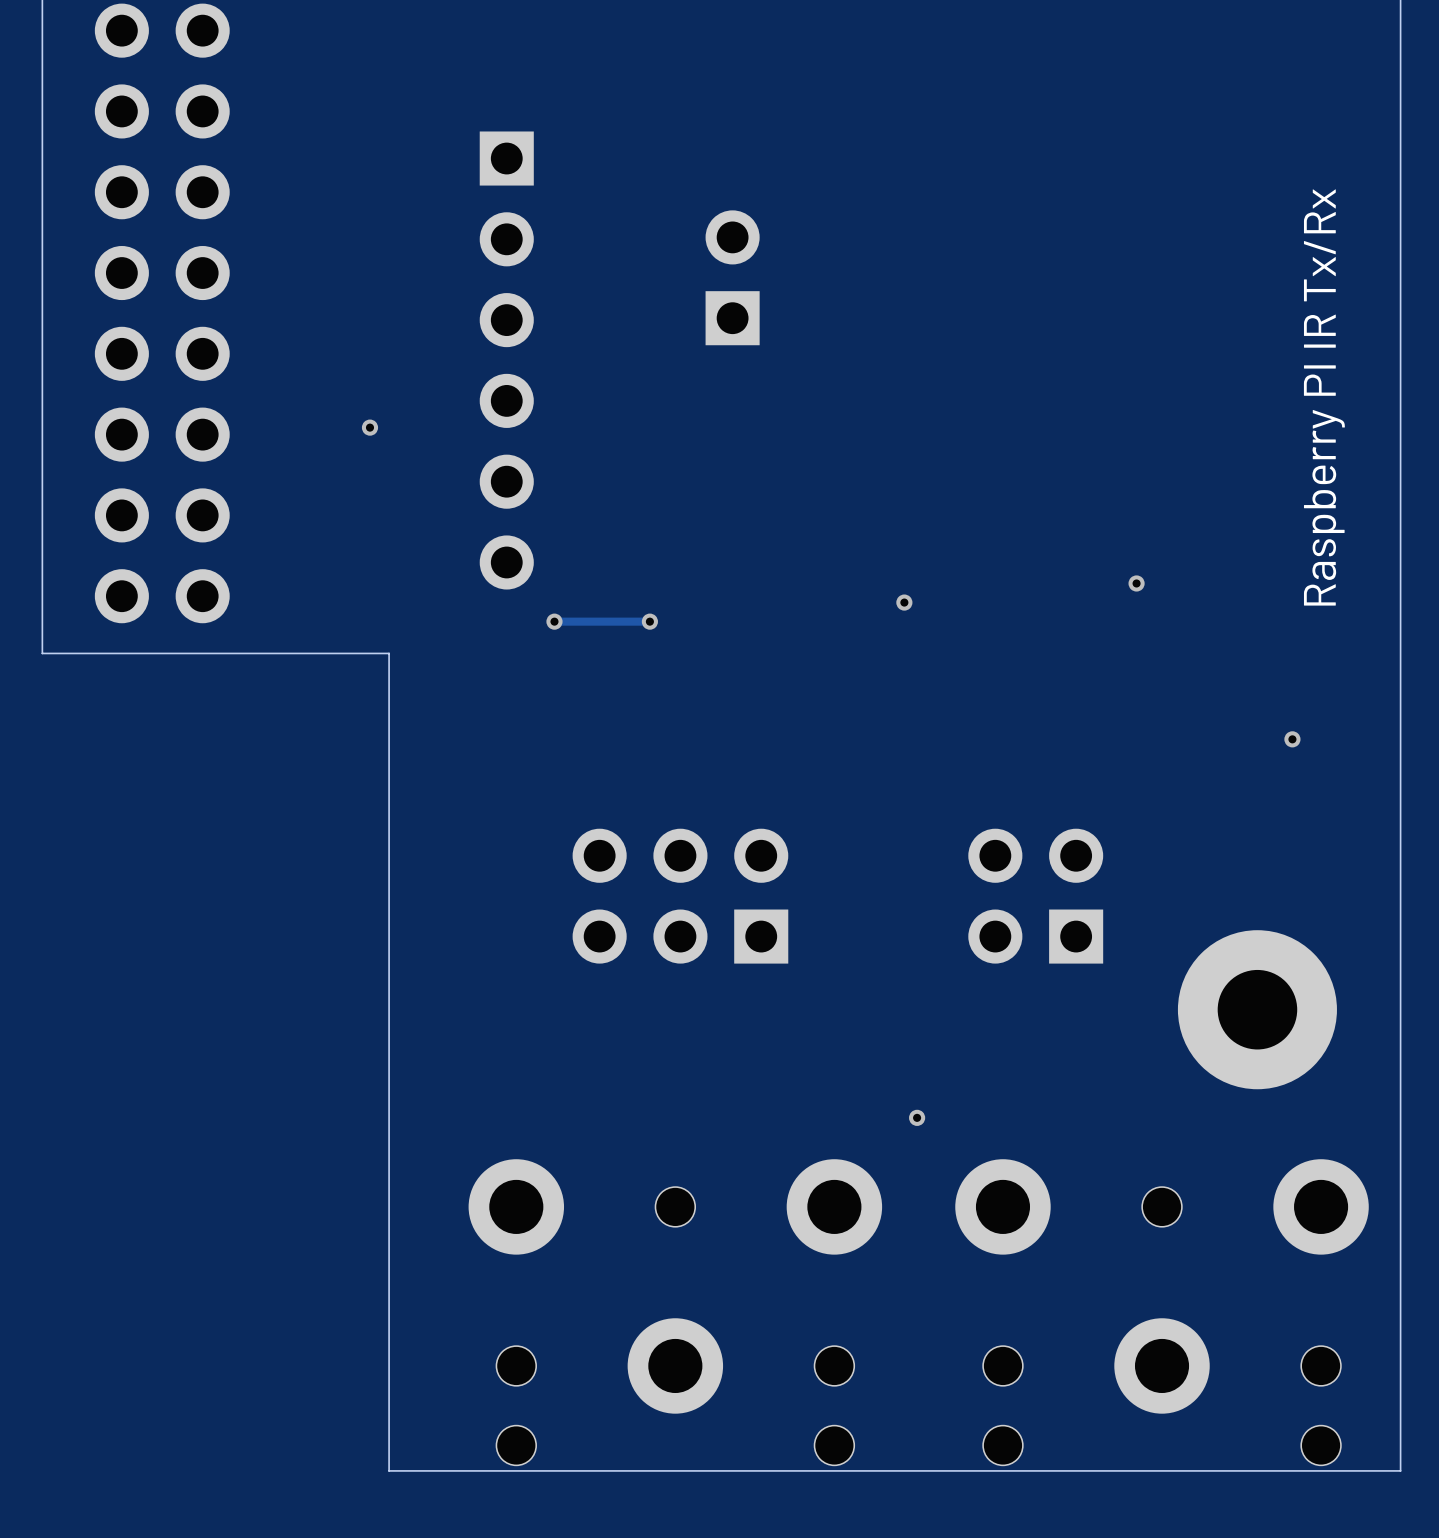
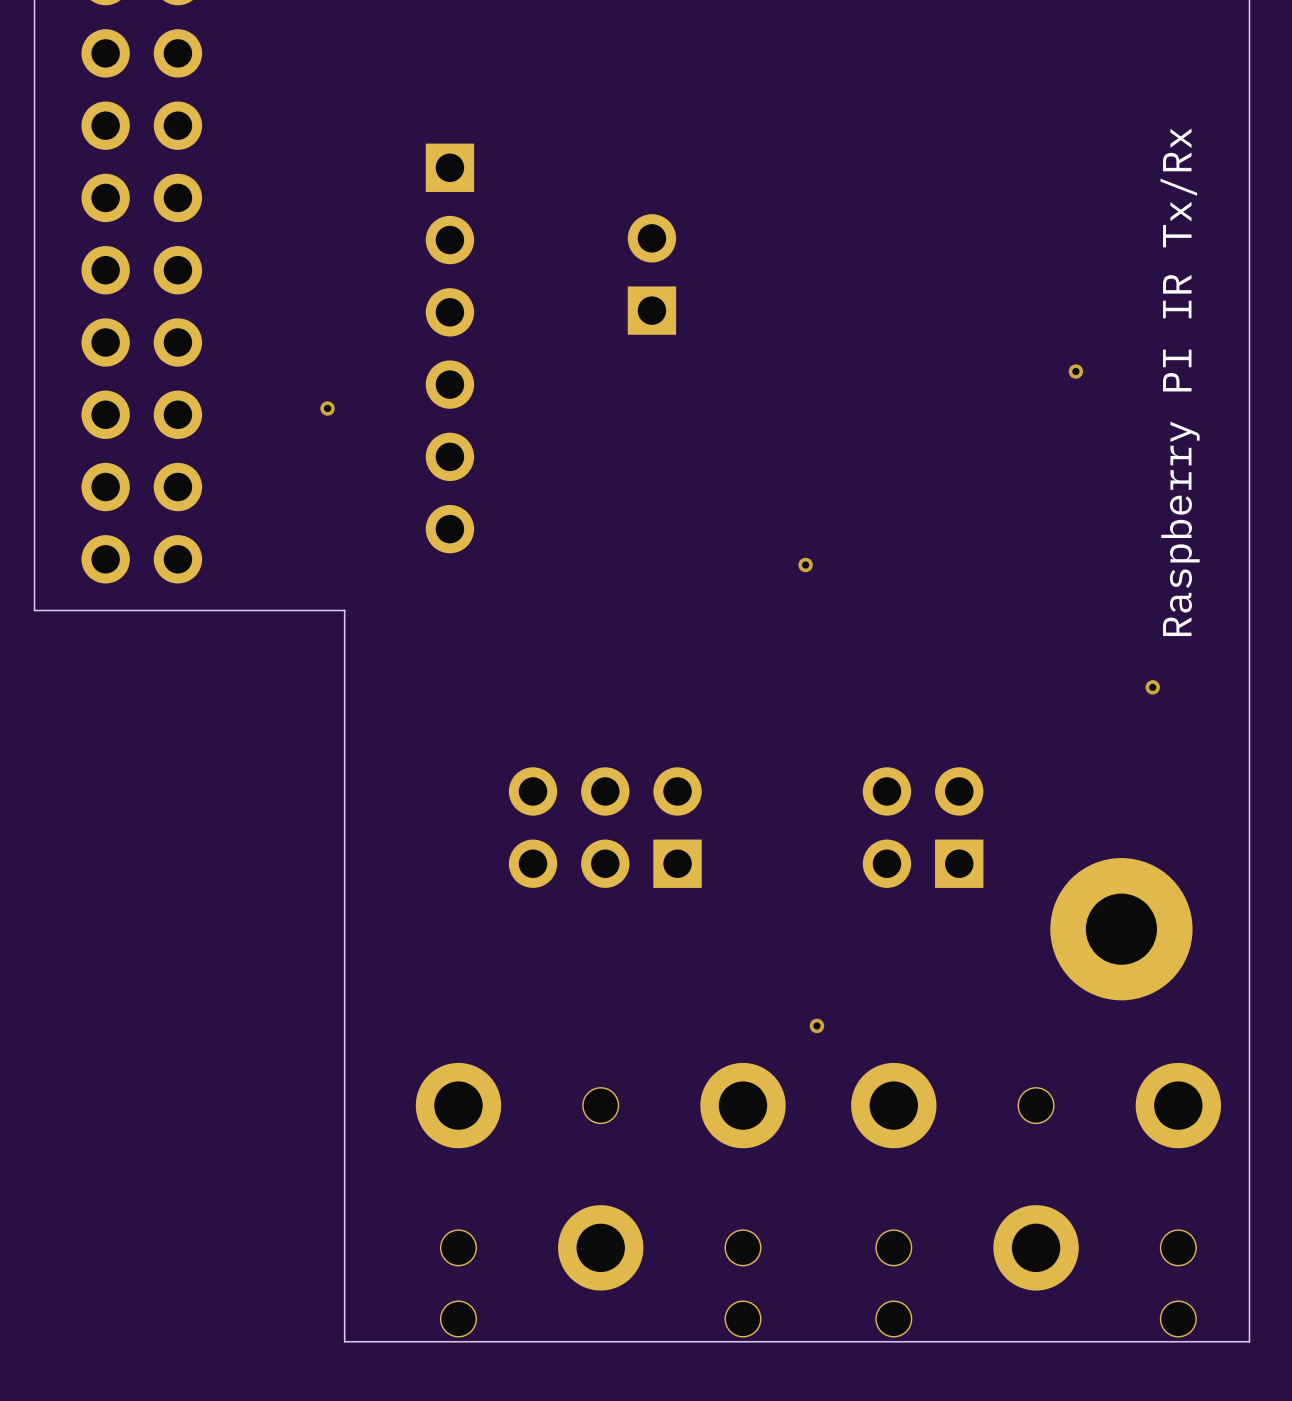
via: none -> (1075, 371)
via: (1136, 583) -> none
via: (554, 621) -> none
track: (649, 621) (554, 621) -> none
via: (649, 621) -> none

